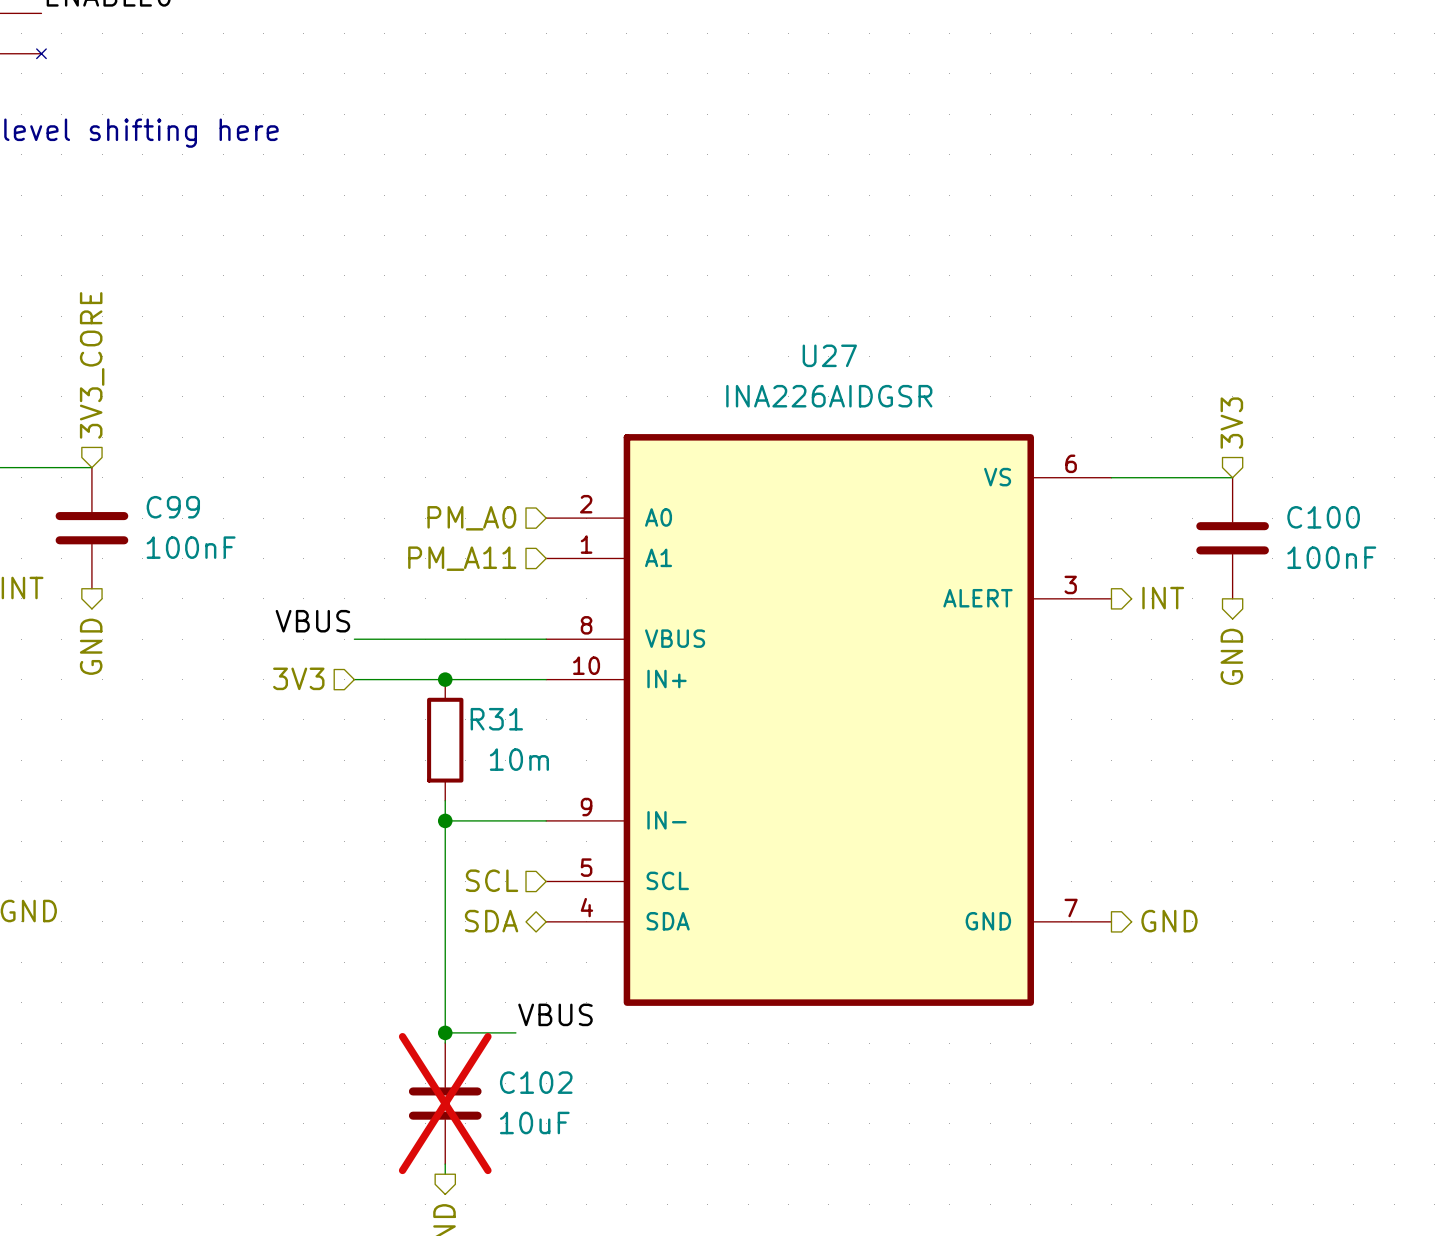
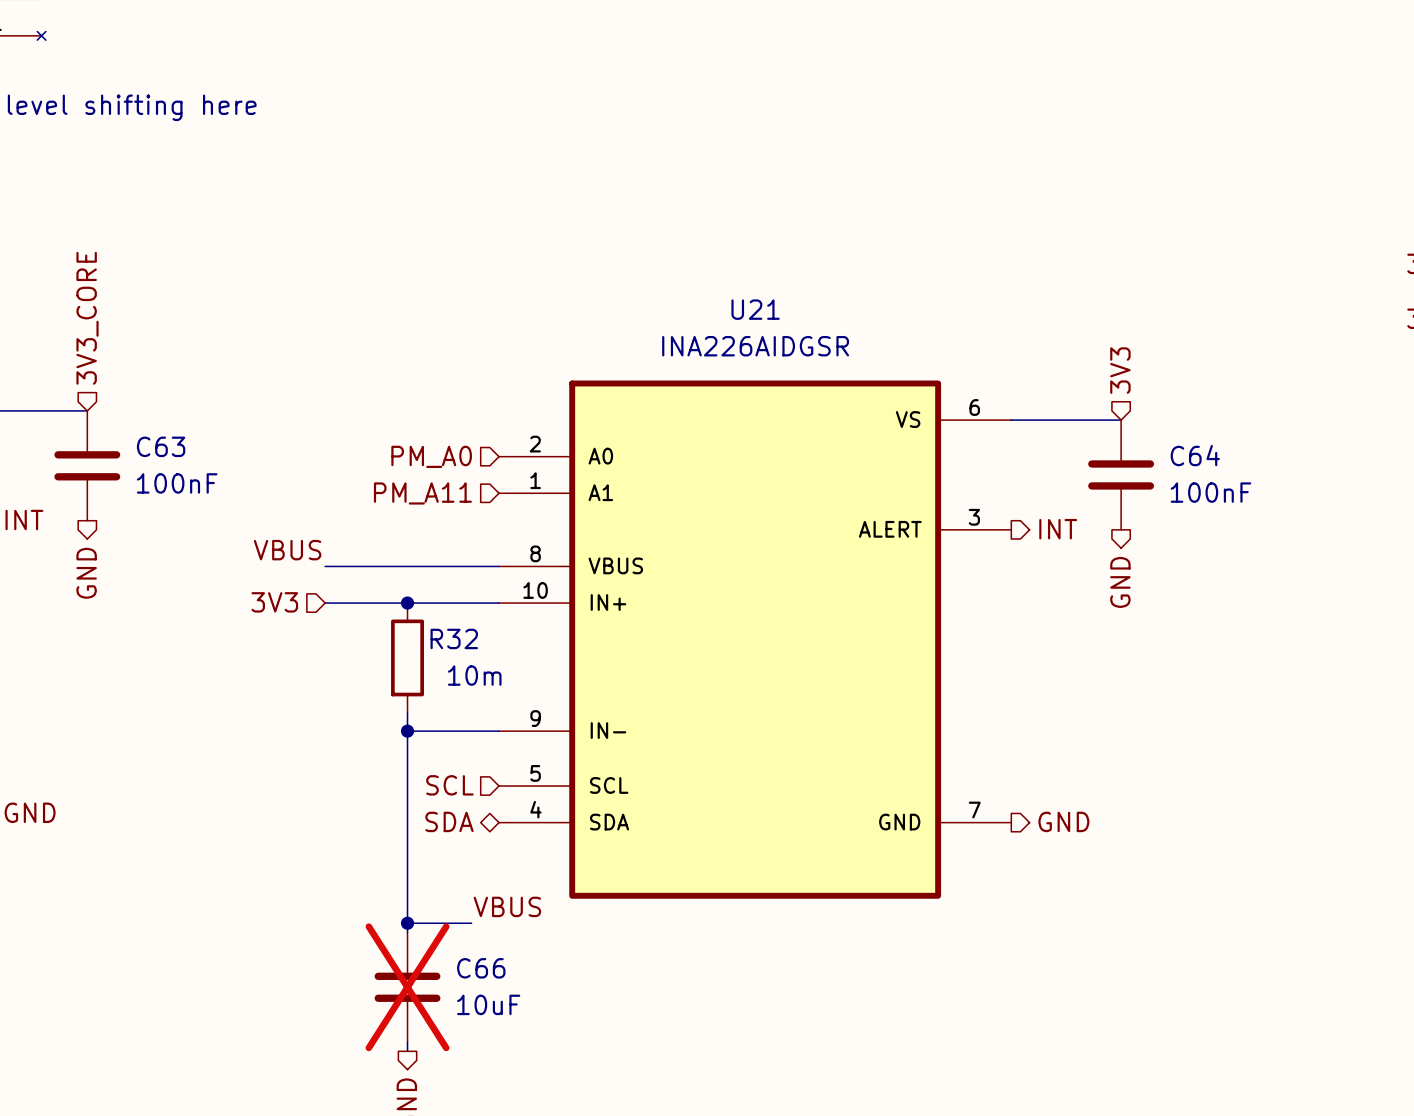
U27 name: U27 (829, 355) -> U21 (755, 309)
C99 name: C99 (173, 507) -> C63 (161, 446)
C100 name: C100 (1323, 517) -> C64 (1195, 455)
R31 name: R31 (496, 719) -> R32 (454, 638)
C102 name: C102 (536, 1082) -> C66 (481, 968)

